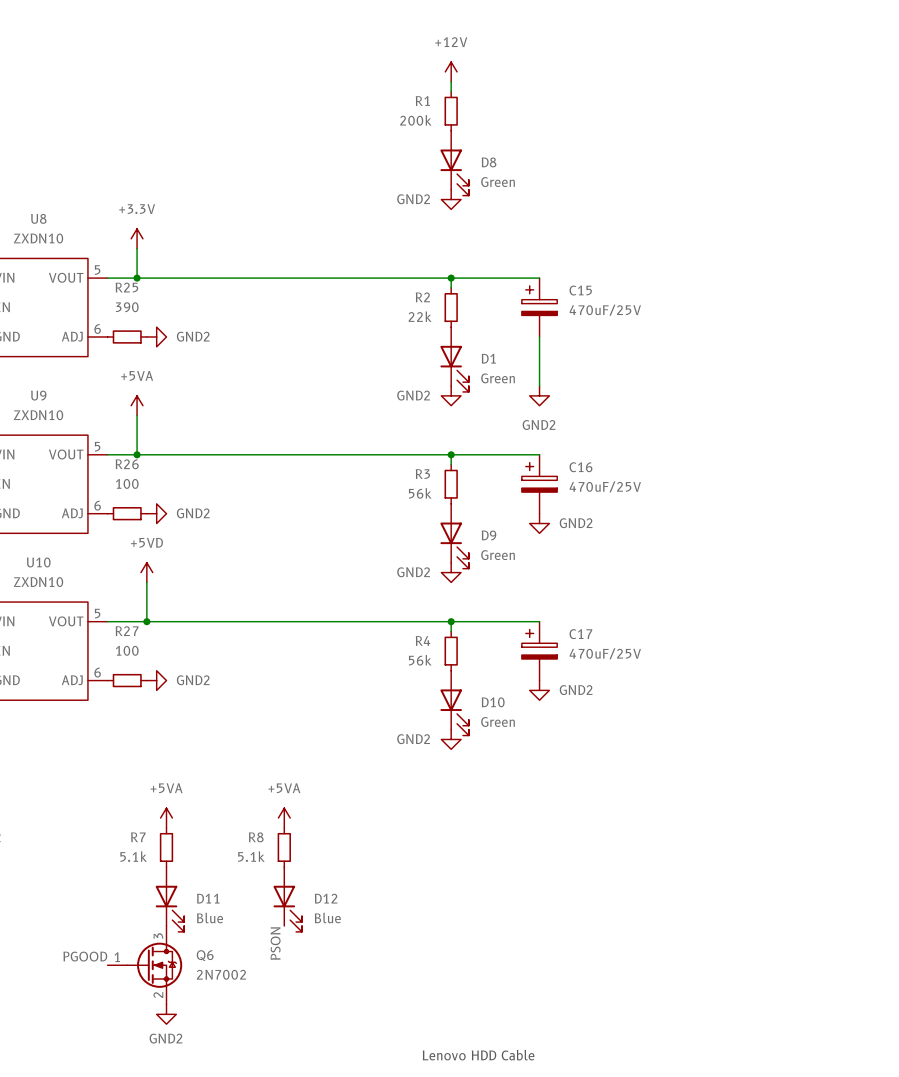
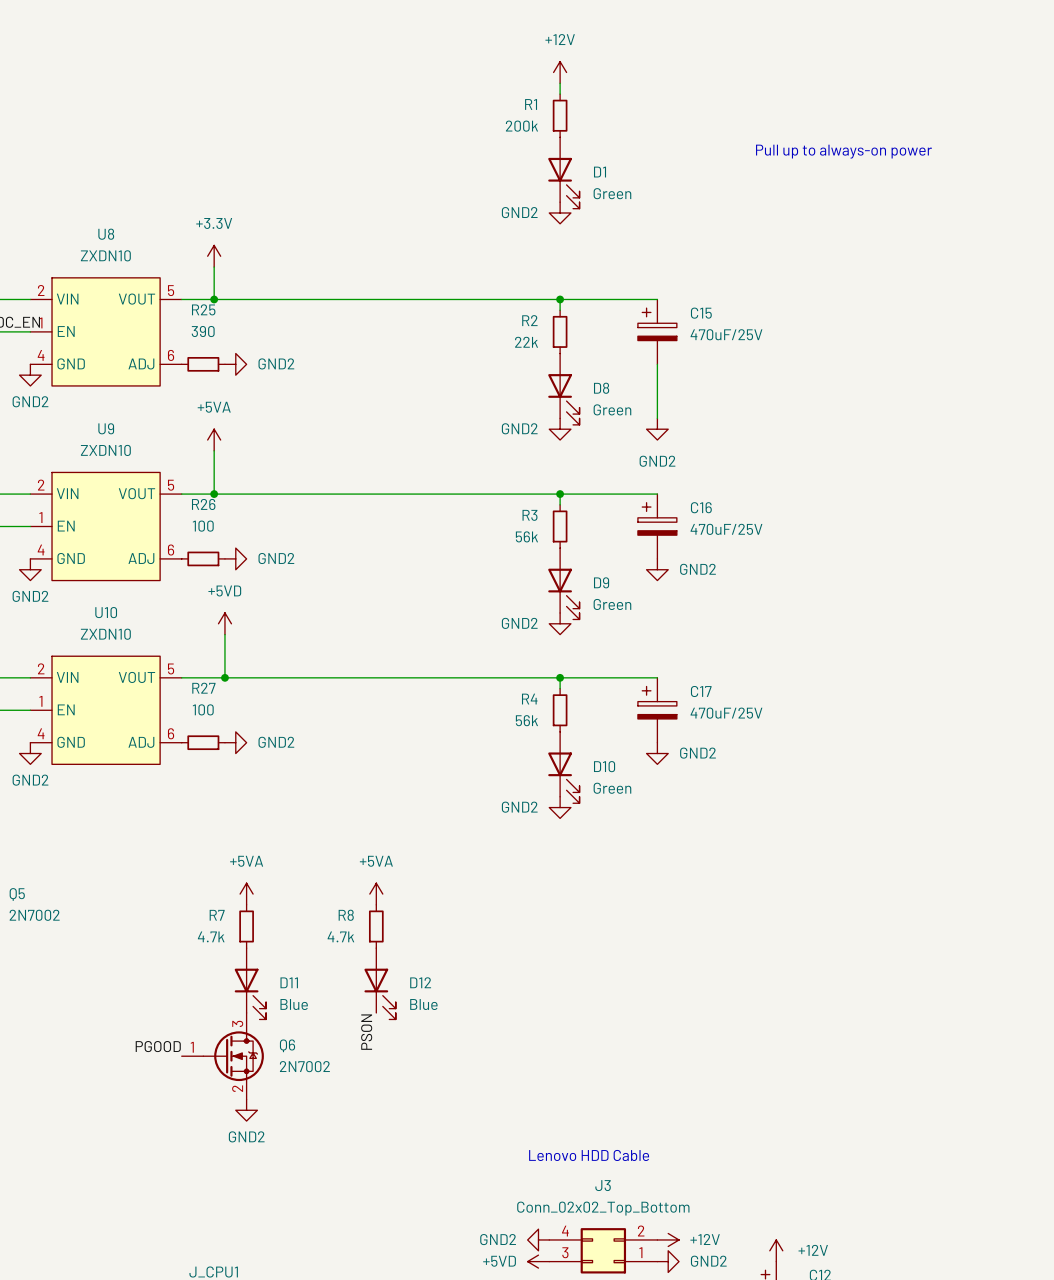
text: none -> Pull up to always-on power (843, 151)
D8 name: D8 (489, 162) -> D1 (600, 172)
D1 name: D1 (488, 358) -> D8 (601, 388)
R7 value: 5.1k (133, 856) -> 4.7k (211, 936)
R8 value: 5.1k (251, 856) -> 4.7k (340, 936)

